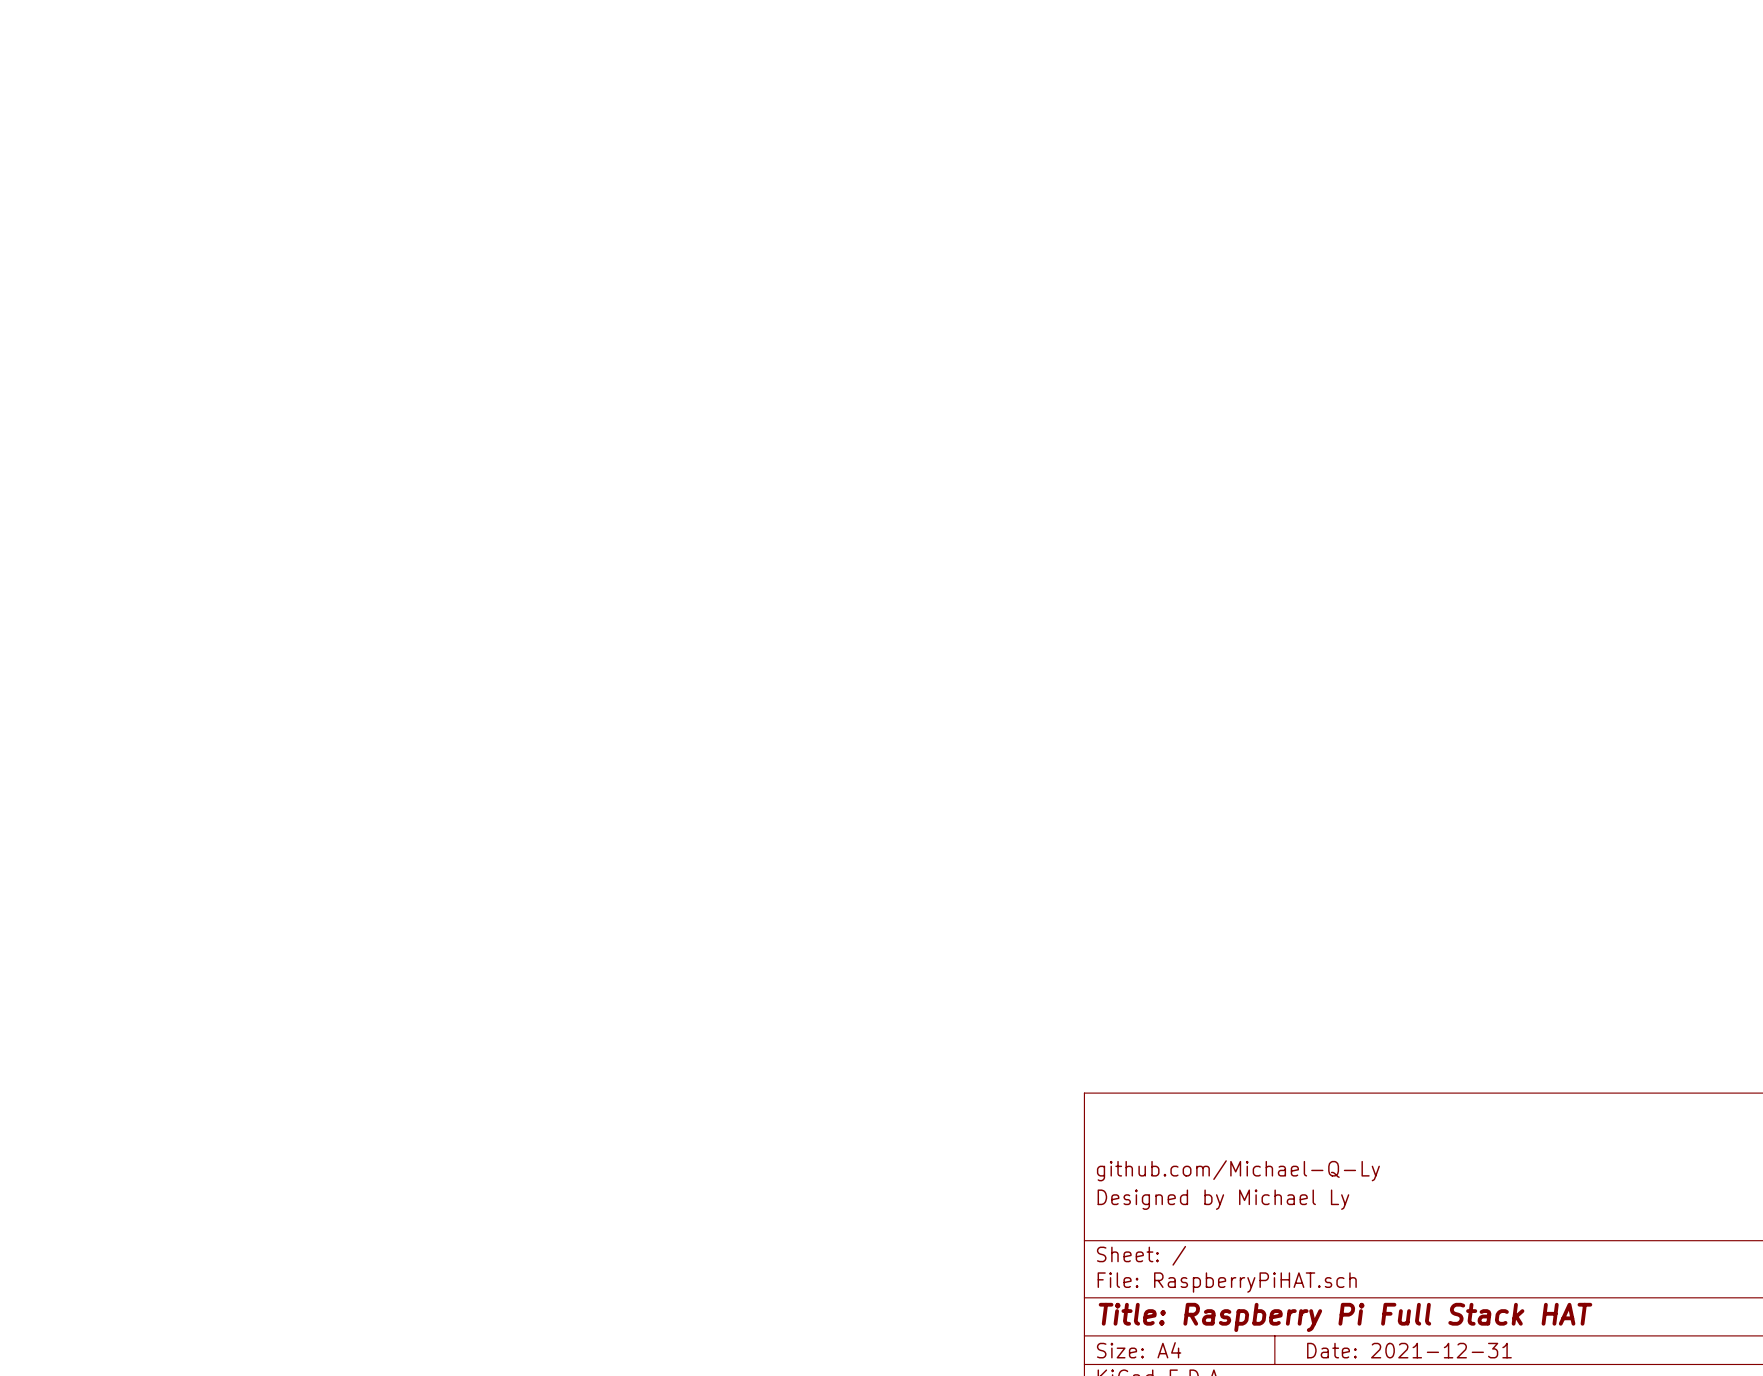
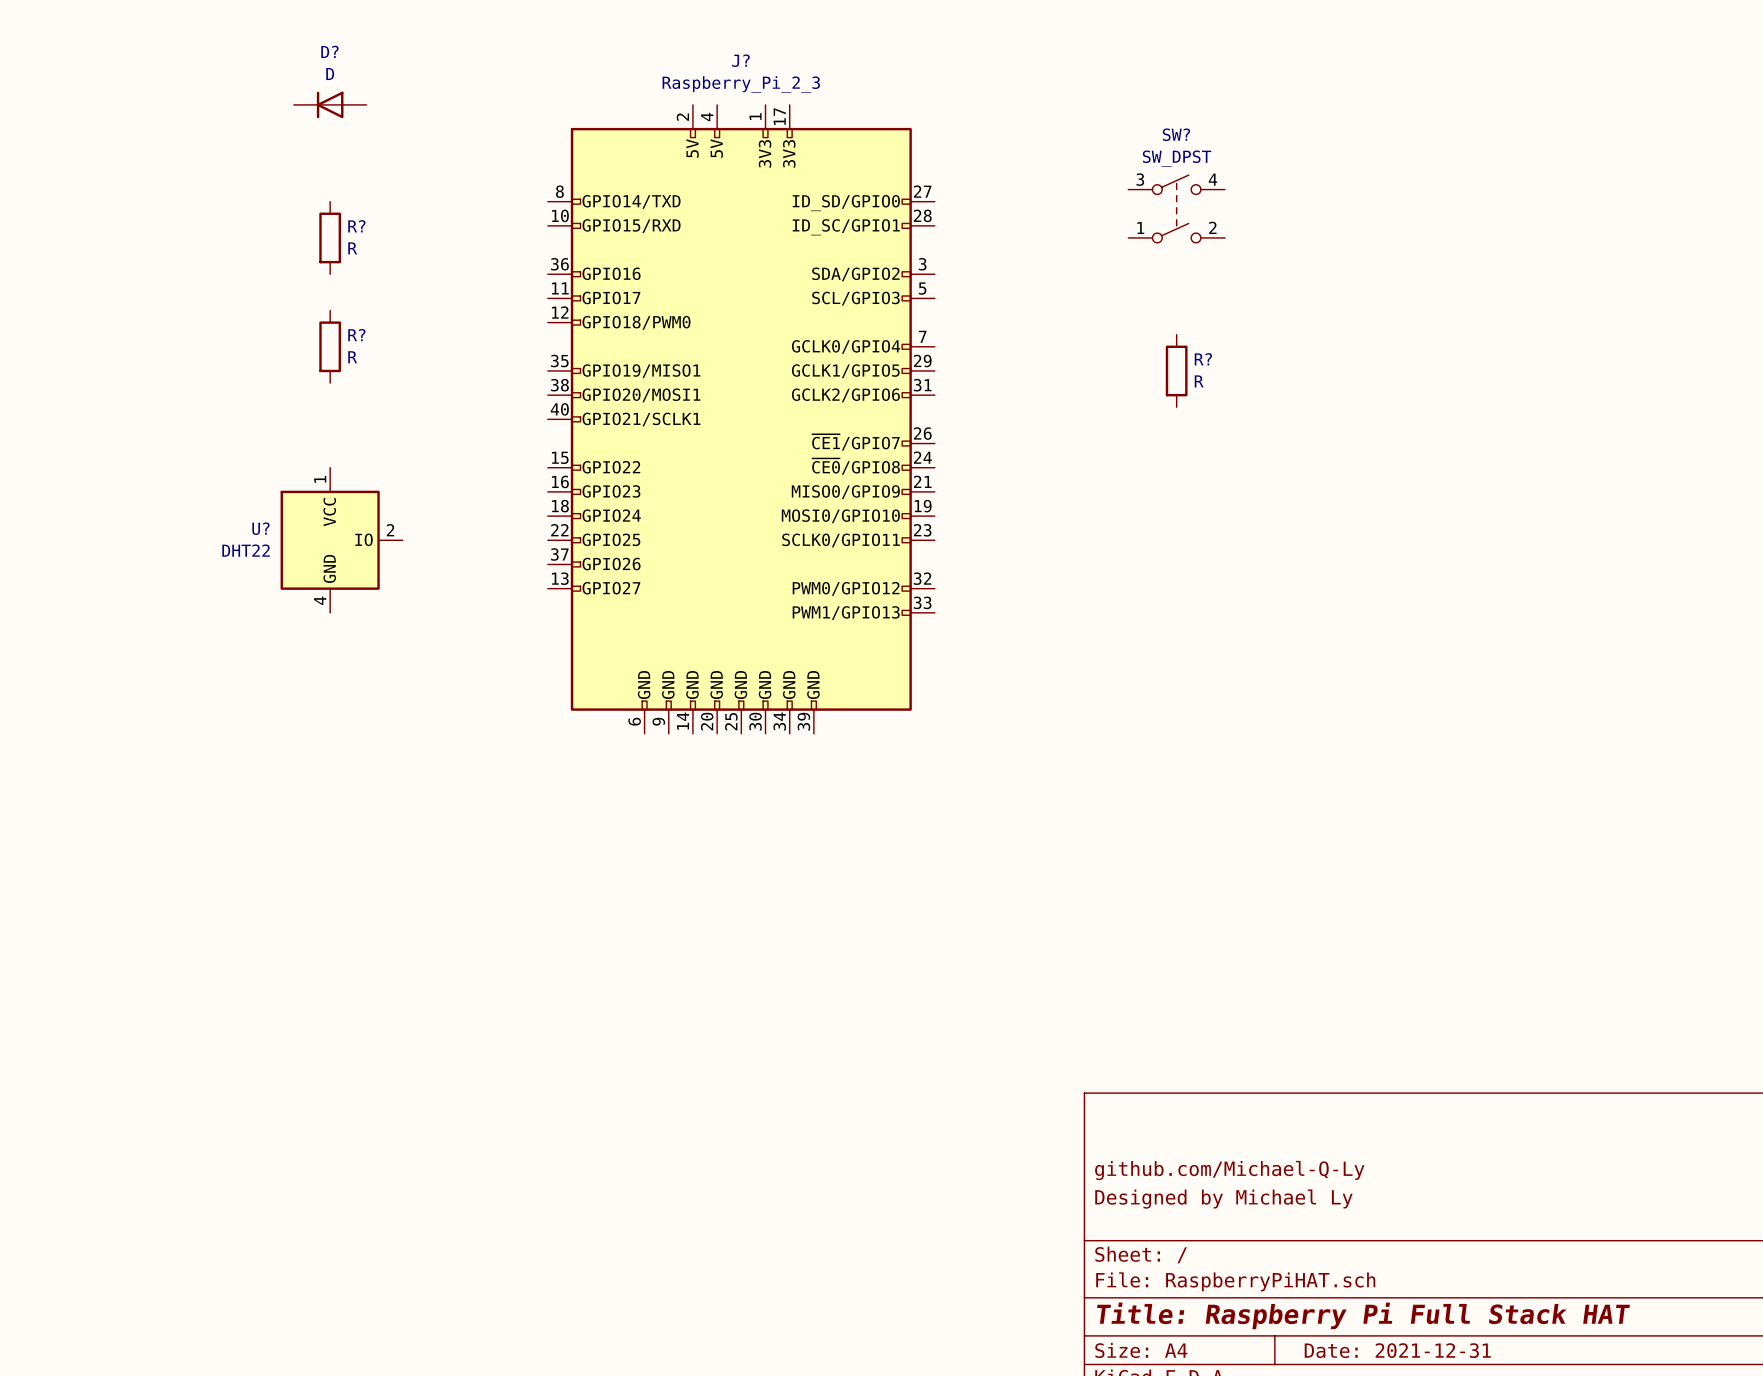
D?: none -> D (330, 104)
SW?: none -> SW_DPST (1176, 208)
R?: none -> R (330, 237)
R?: none -> R (330, 346)
R?: none -> R (1176, 370)
J?: none -> Raspberry_Pi_2_3 (741, 419)
U?: none -> DHT22 (341, 540)

